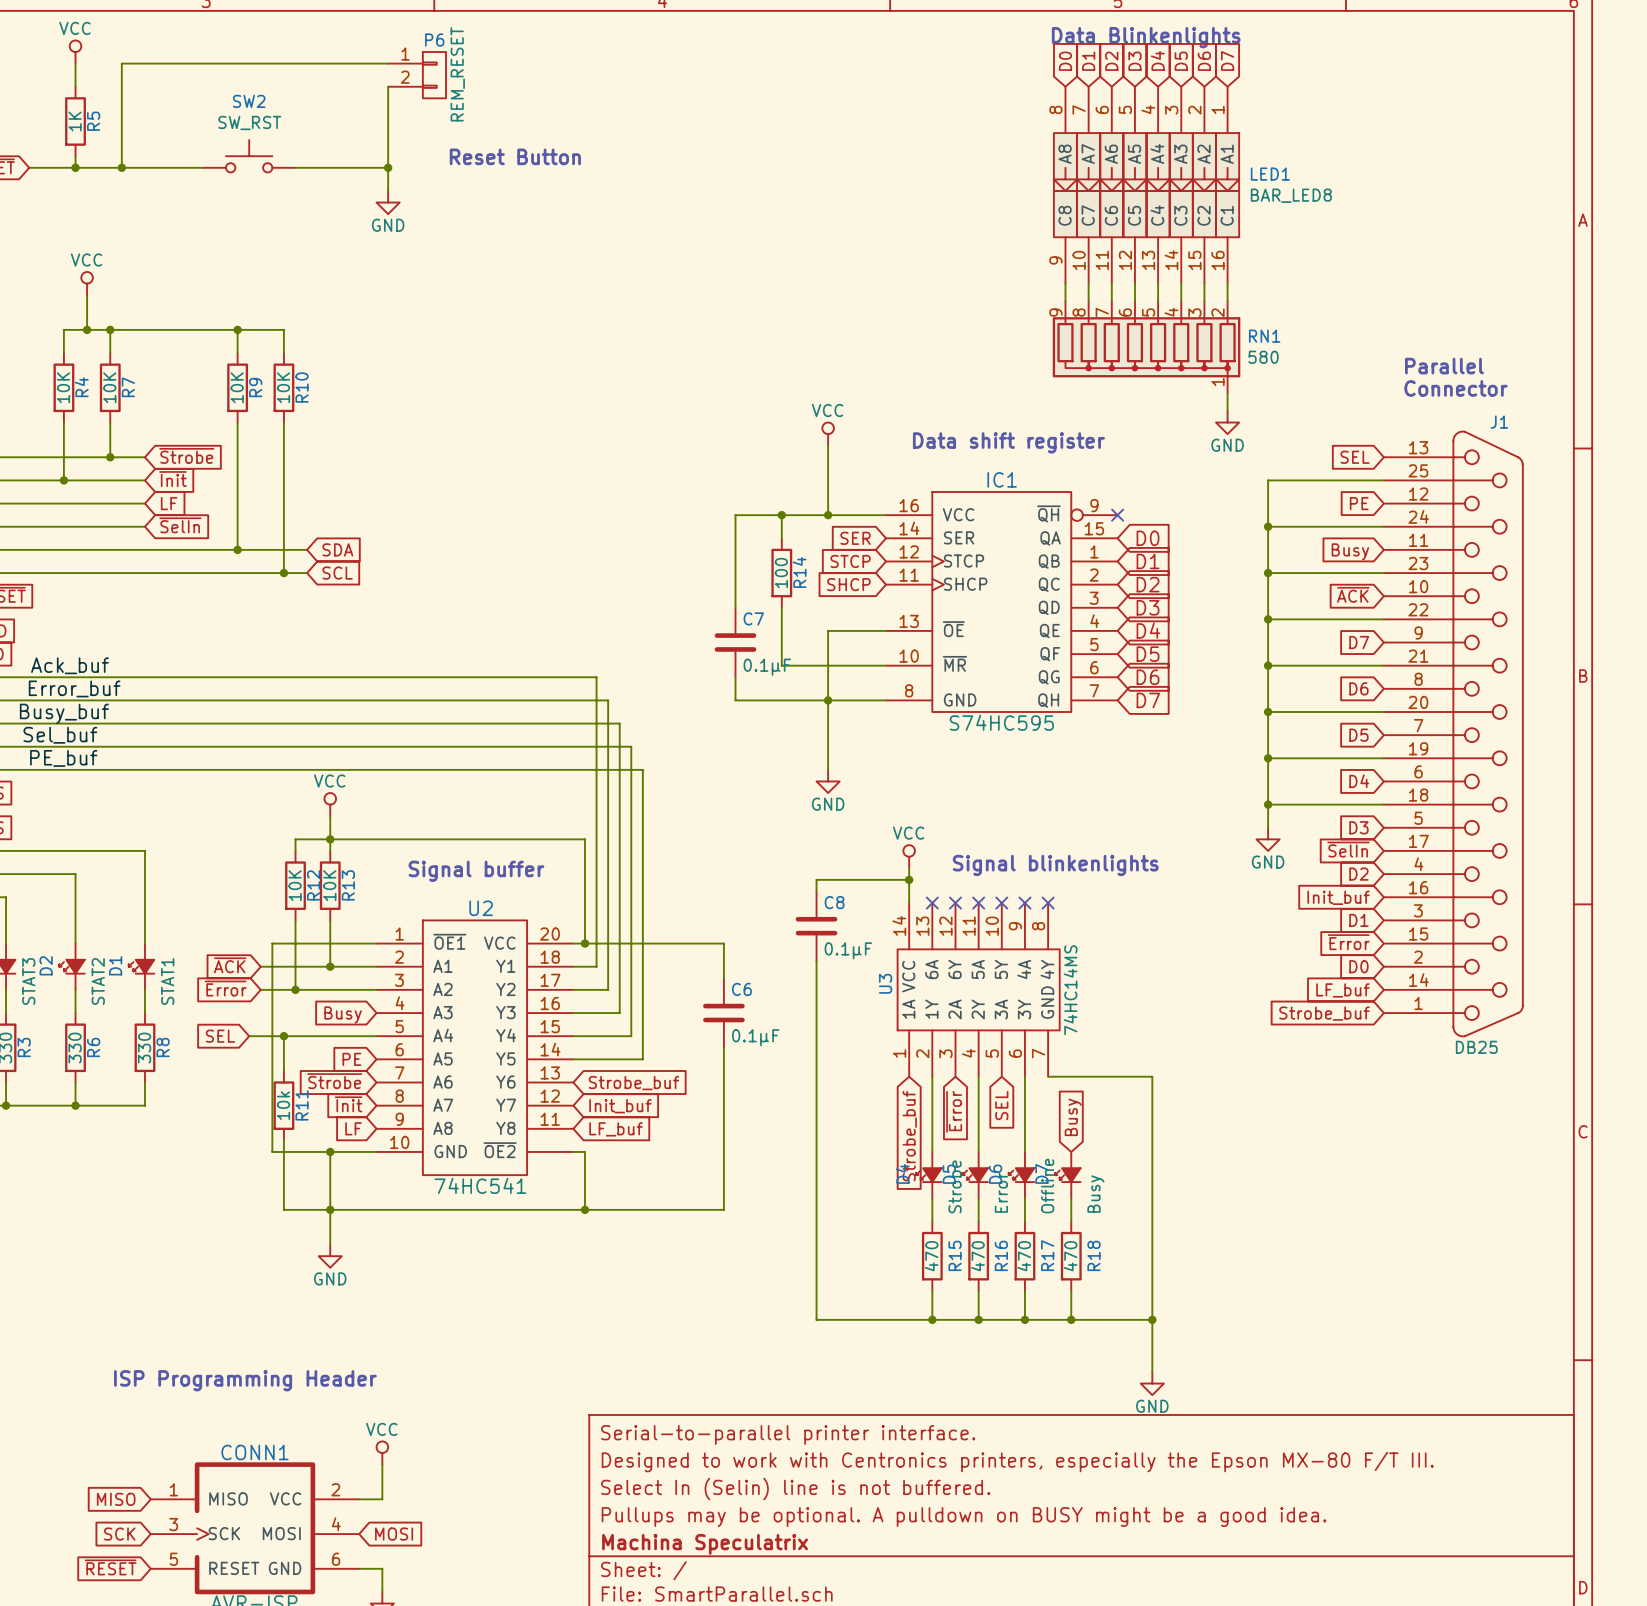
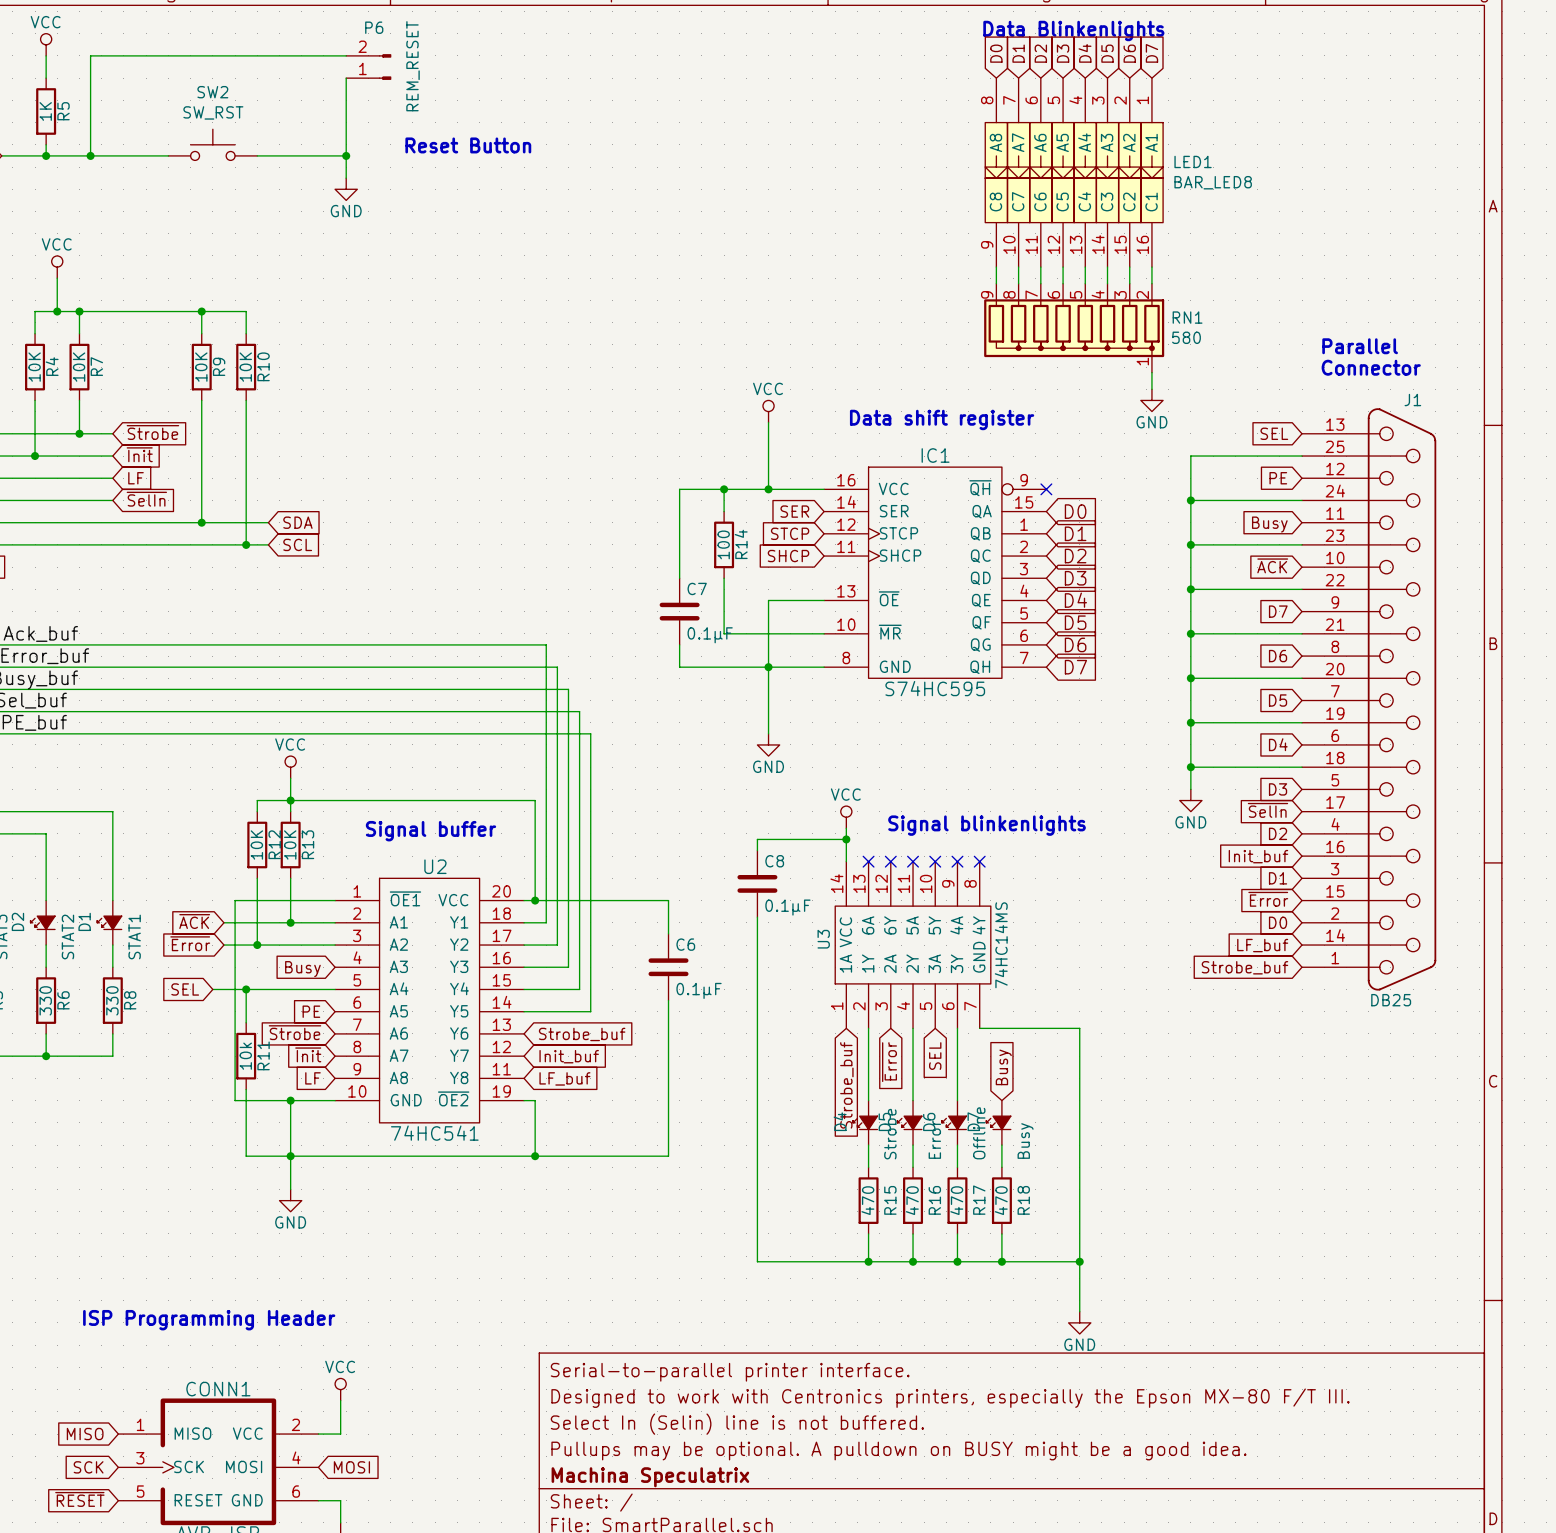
P6 symbol: [388, 52, 447, 99] -> [346, 54, 392, 80]
U2 pin number: none -> 19 (501, 1091)

